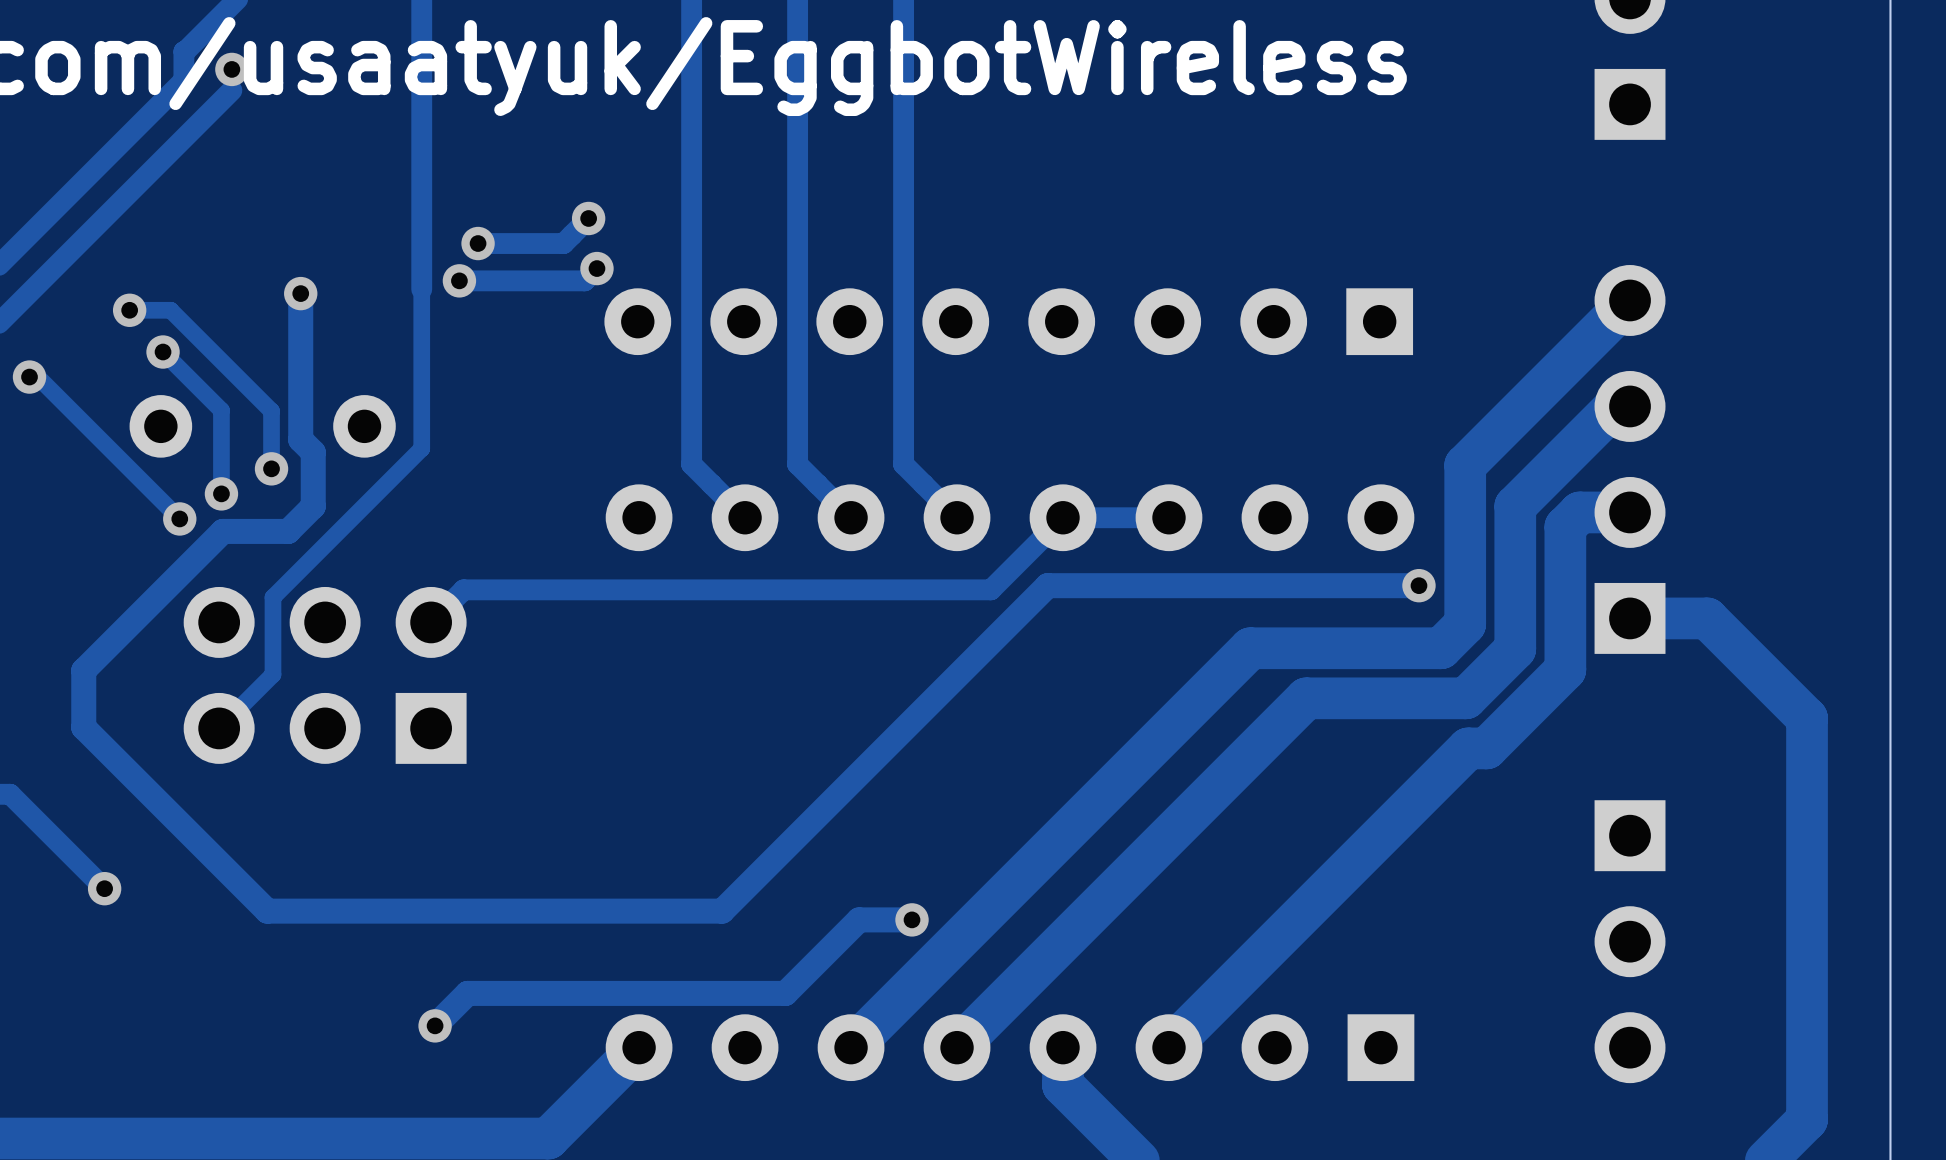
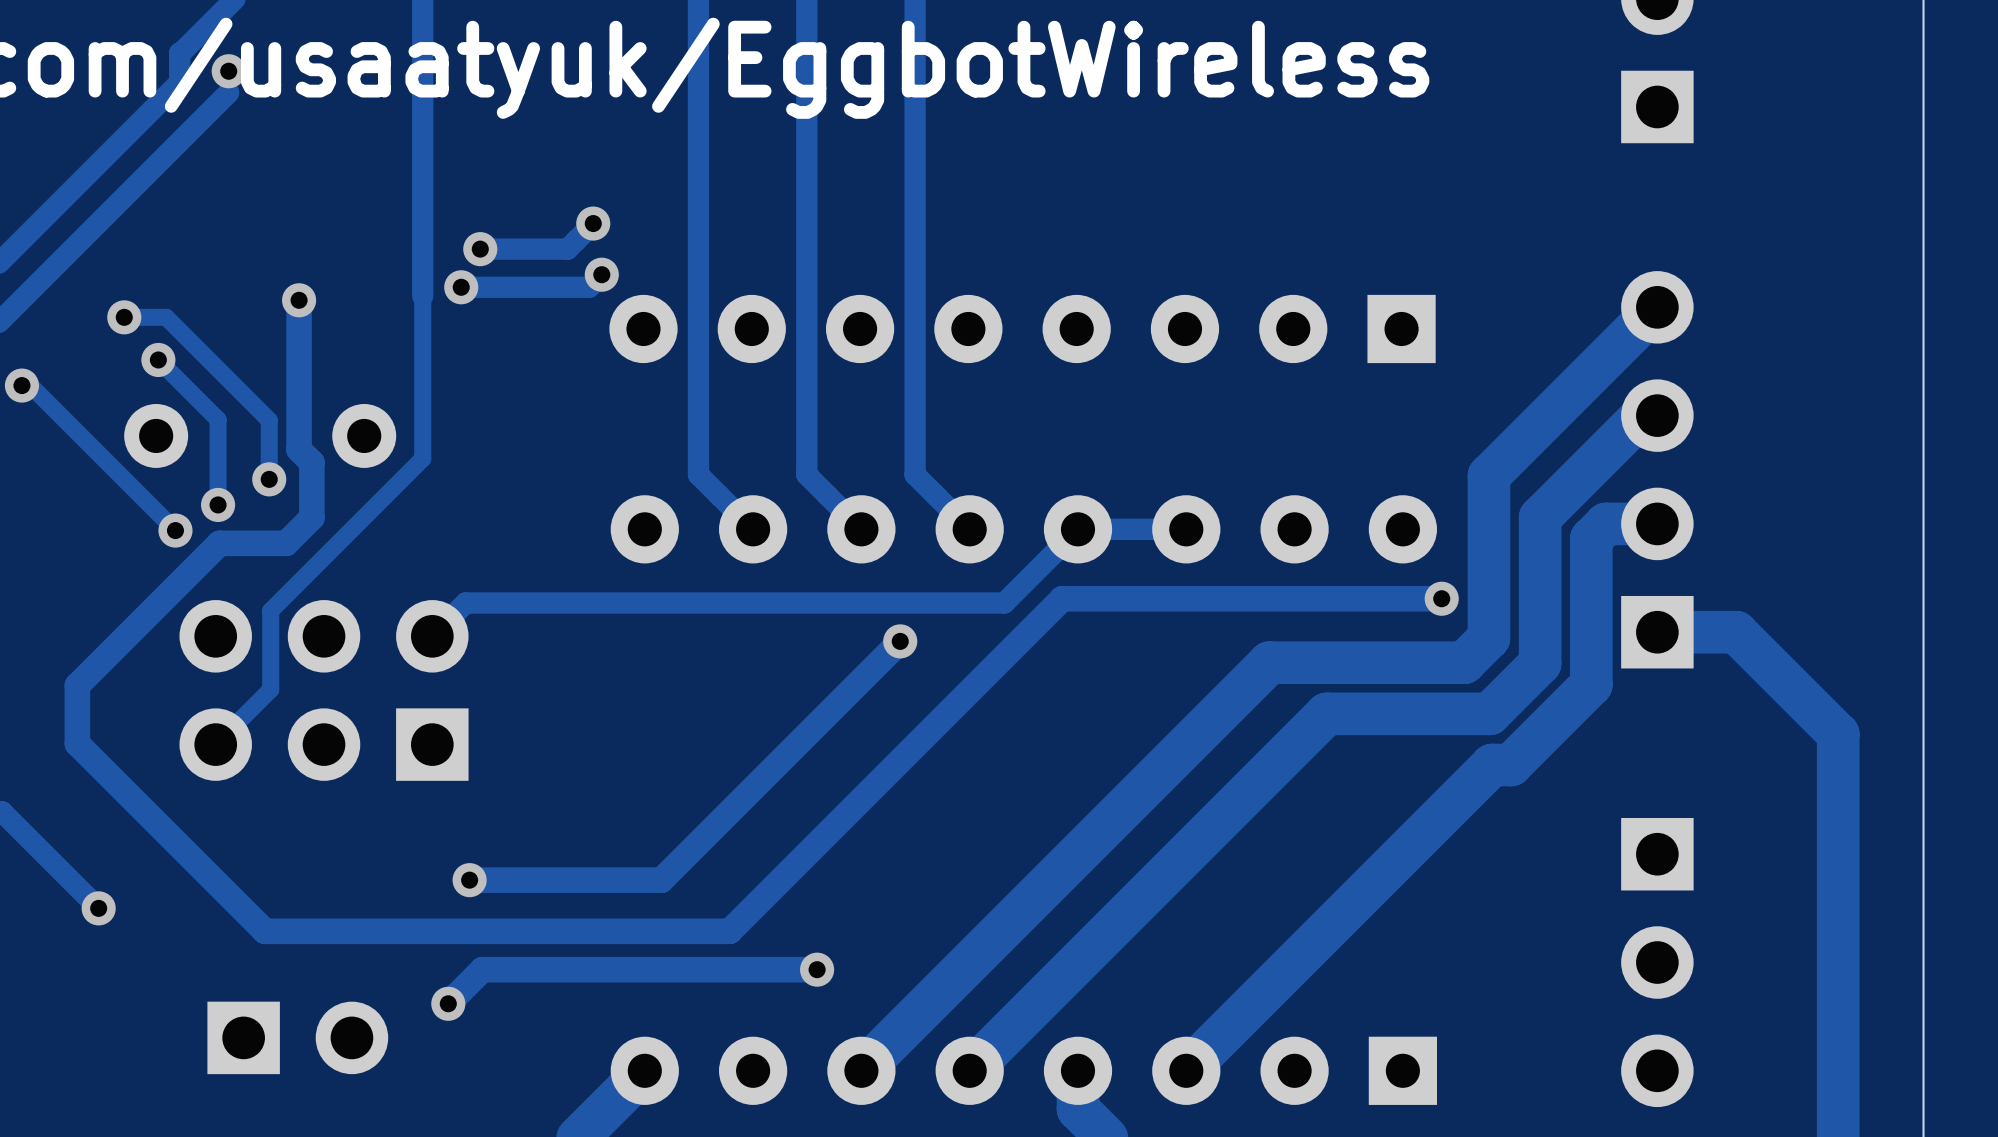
track: none -> (900, 641) (661, 880) (469, 880)
via: none -> (900, 641)
via: none -> (469, 880)
track: (912, 919) (859, 919) (785, 993) (467, 993) (435, 1025) -> none
via position: (912, 919) -> (817, 969)
track: none -> (817, 969) (482, 969) (448, 1003)
part: none -> (297, 1037)
via position: (435, 1025) -> (448, 1003)

